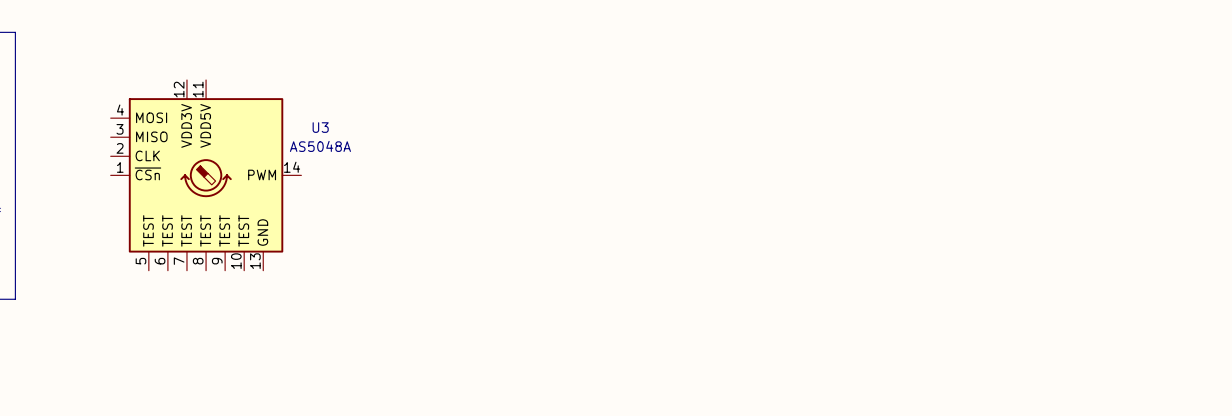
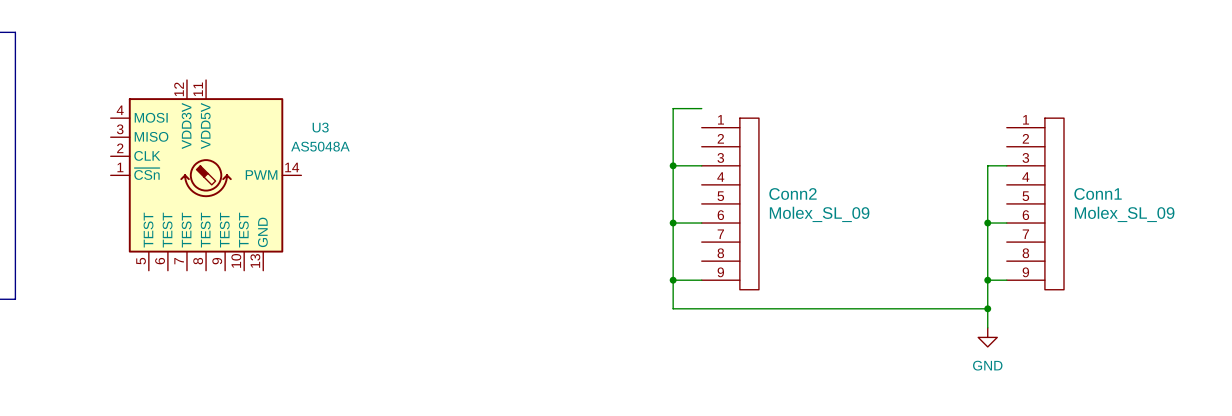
wire: none -> (701, 108) (673, 108) (673, 308) (987, 308)
wire: none -> (673, 165) (701, 165)
junction: none -> (673, 165)
wire: none -> (1006, 165) (987, 165) (987, 327)
Conn2: none -> Molex_SL_09 (730, 203)
Conn1: none -> Molex_SL_09 (1035, 203)
wire: none -> (673, 223) (701, 223)
junction: none -> (673, 223)
wire: none -> (987, 223) (1006, 223)
junction: none -> (987, 223)
wire: none -> (673, 280) (701, 280)
junction: none -> (673, 280)
wire: none -> (987, 280) (1006, 280)
junction: none -> (987, 280)
junction: none -> (987, 308)
power symbol: none -> GND (987, 337)

